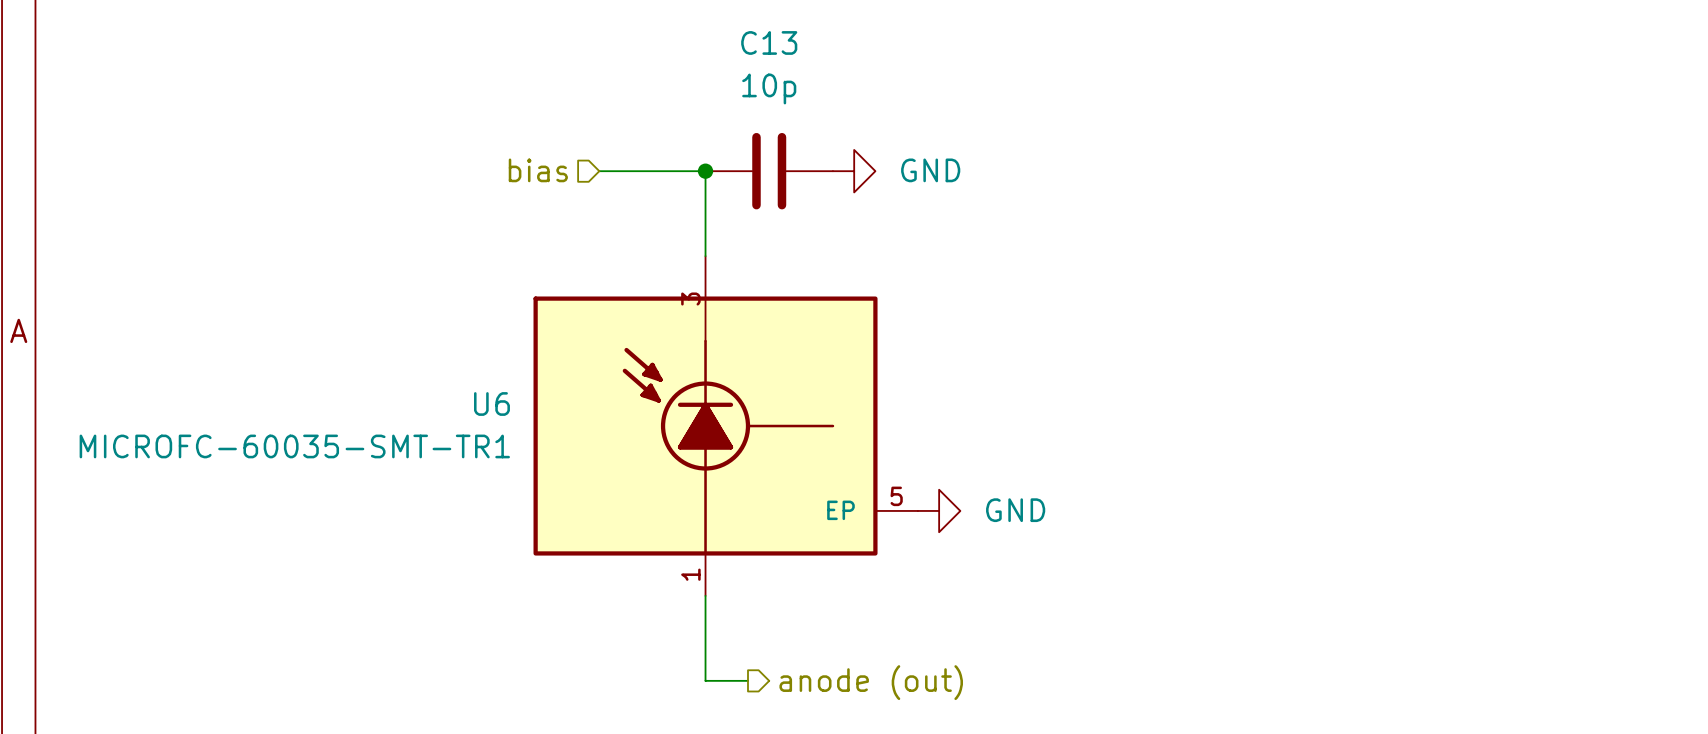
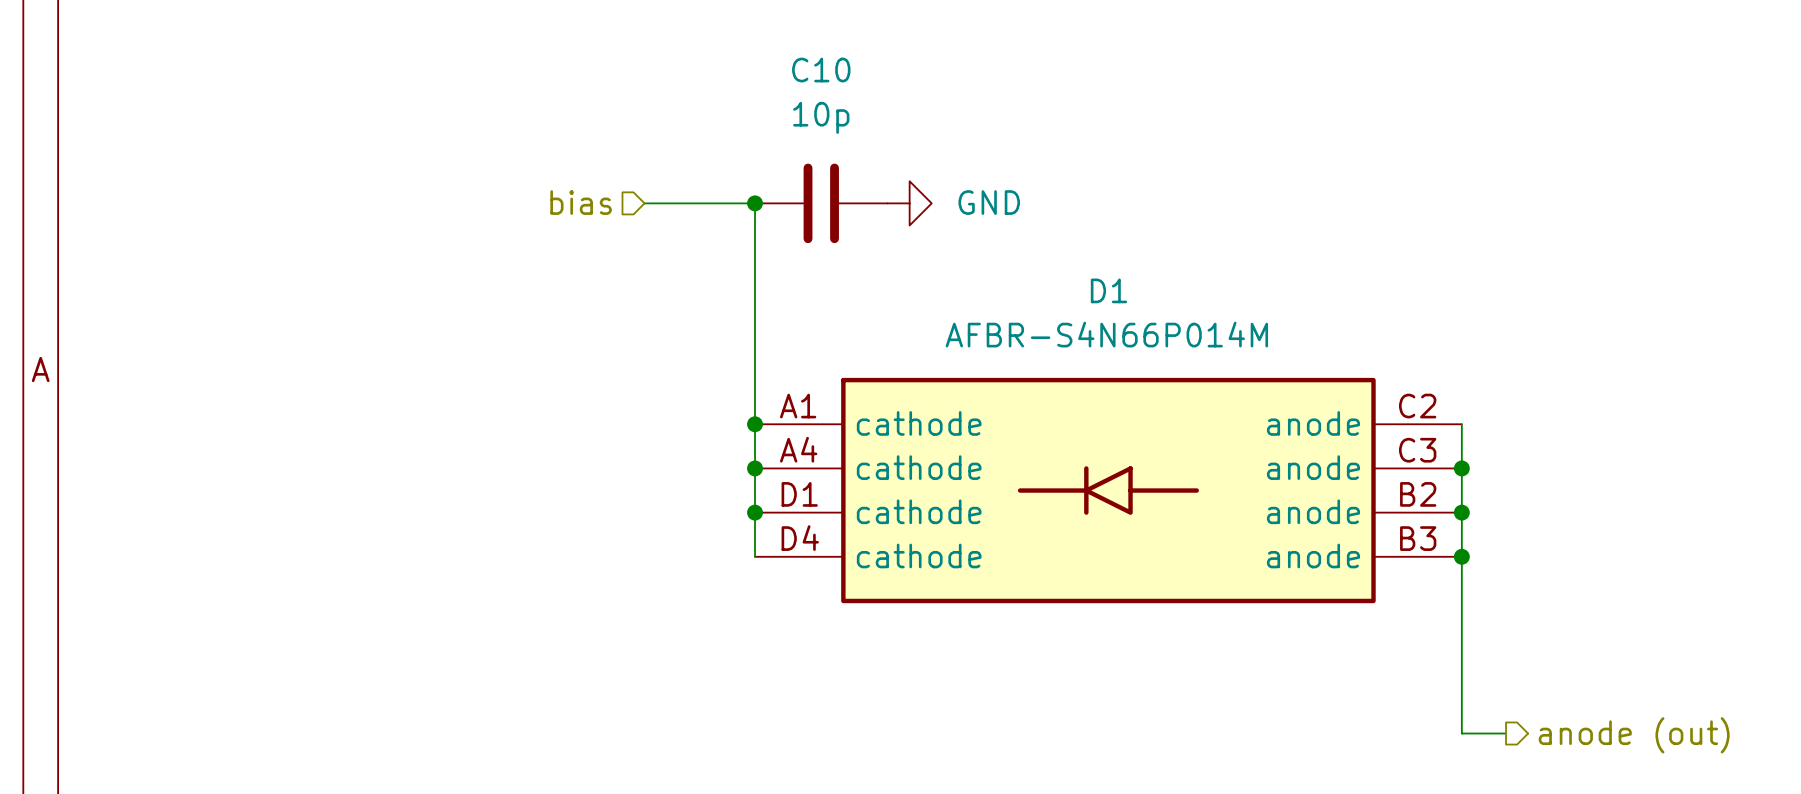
C13 name: C13 (769, 42) -> C10 (821, 70)
junction: none -> (755, 424)
wire: none -> (1461, 424) (1461, 733) (1506, 733)
junction: none -> (755, 468)
U6: MICROFC-60035-SMT-TR1 (725, 426) -> none
junction: none -> (1461, 468)
D1: none -> AFBR-S4N66P014M (1108, 490)
junction: none -> (755, 512)
junction: none -> (1461, 512)
power symbol: GND (939, 510) -> none
junction: none -> (1461, 556)
wire: (705, 595) (705, 680) (747, 680) -> none
hierarchical label: anode (out) (871, 682) -> none
hierarchical label: none -> anode (out) (1634, 735)

